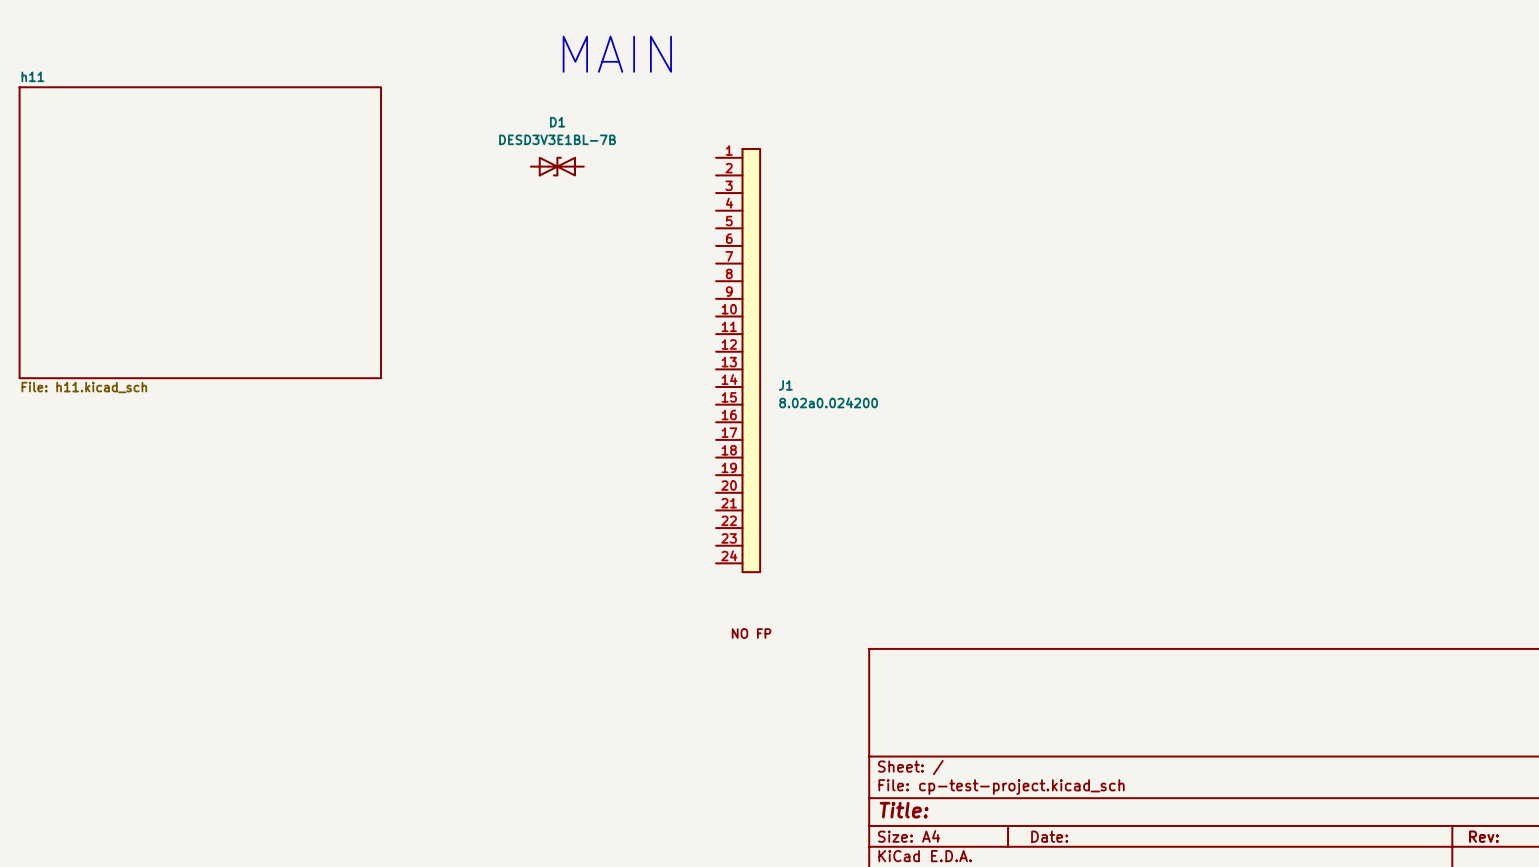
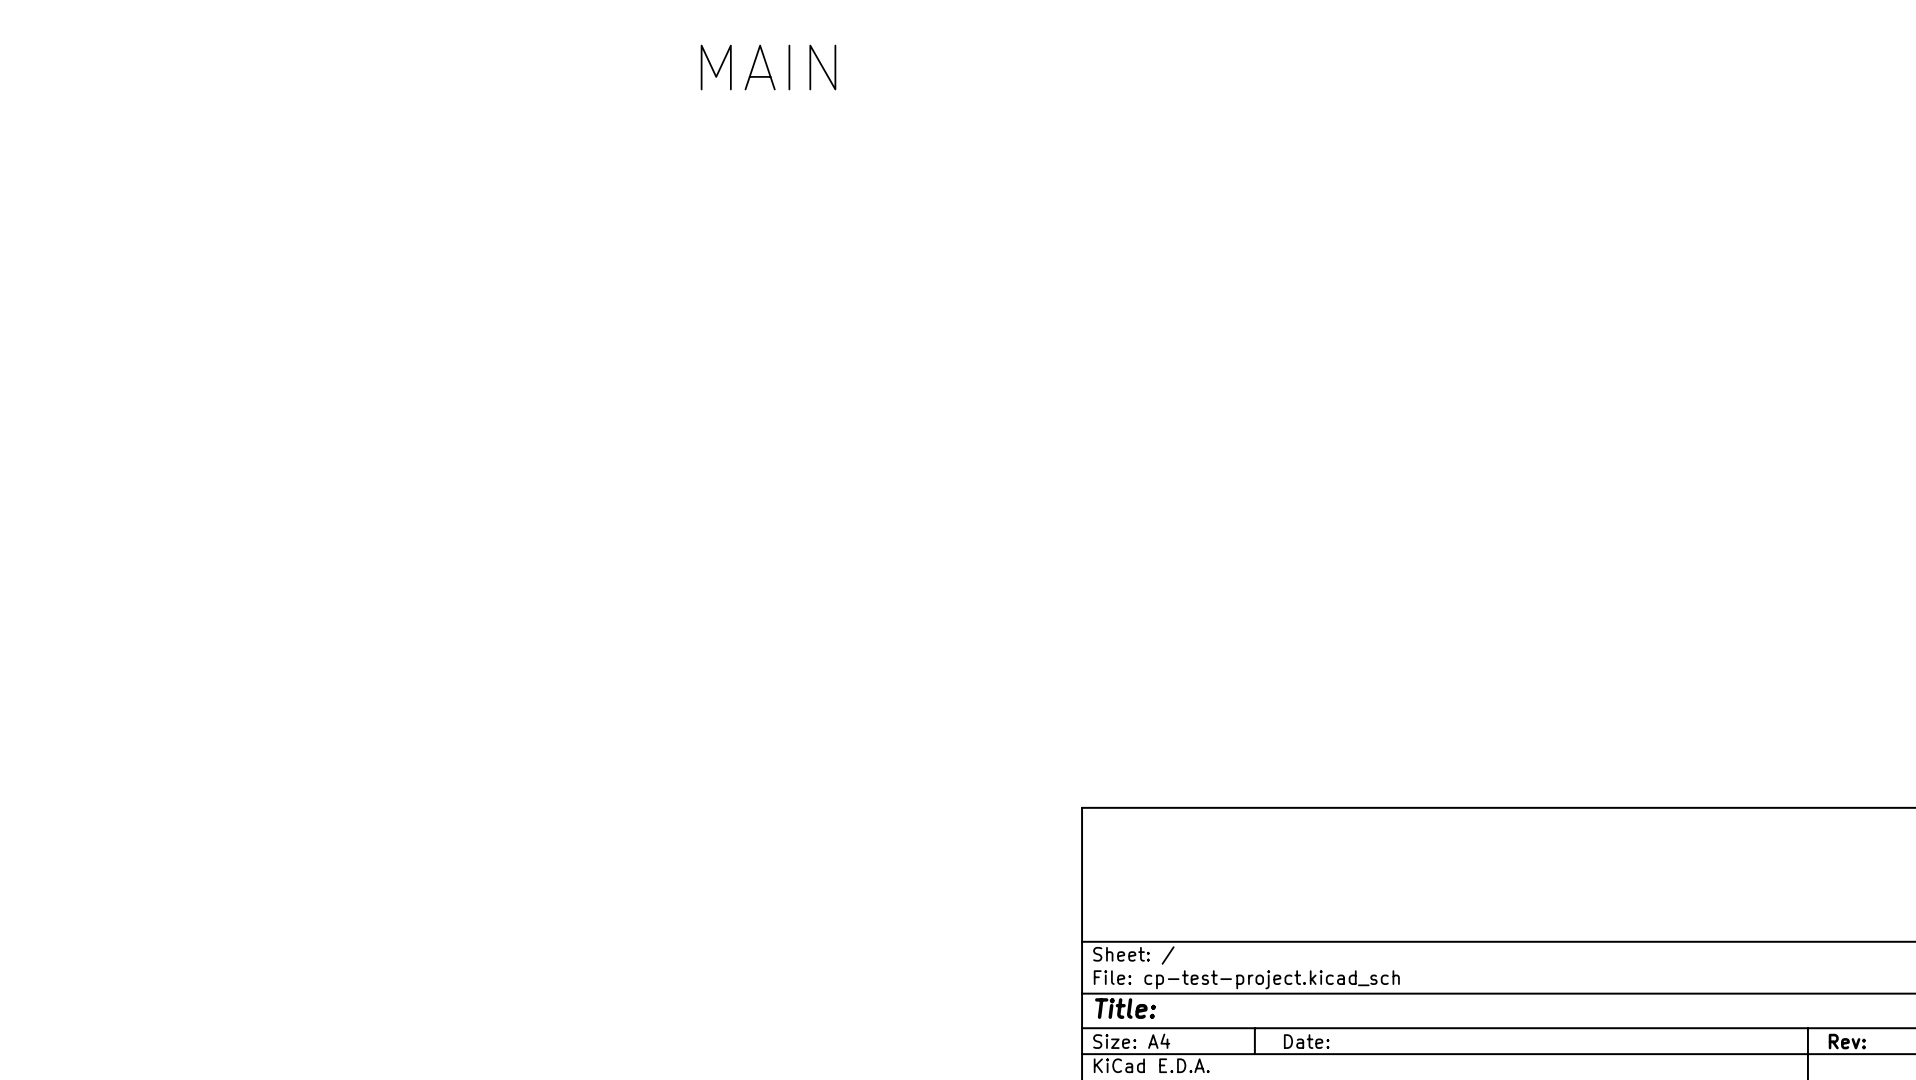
D1: DESD3V3E1BL-7B (557, 166) -> none
sheet h11: File: h11.kicad_sch (200, 232) -> none
J1: 8.02a0.024200 (738, 360) -> none

